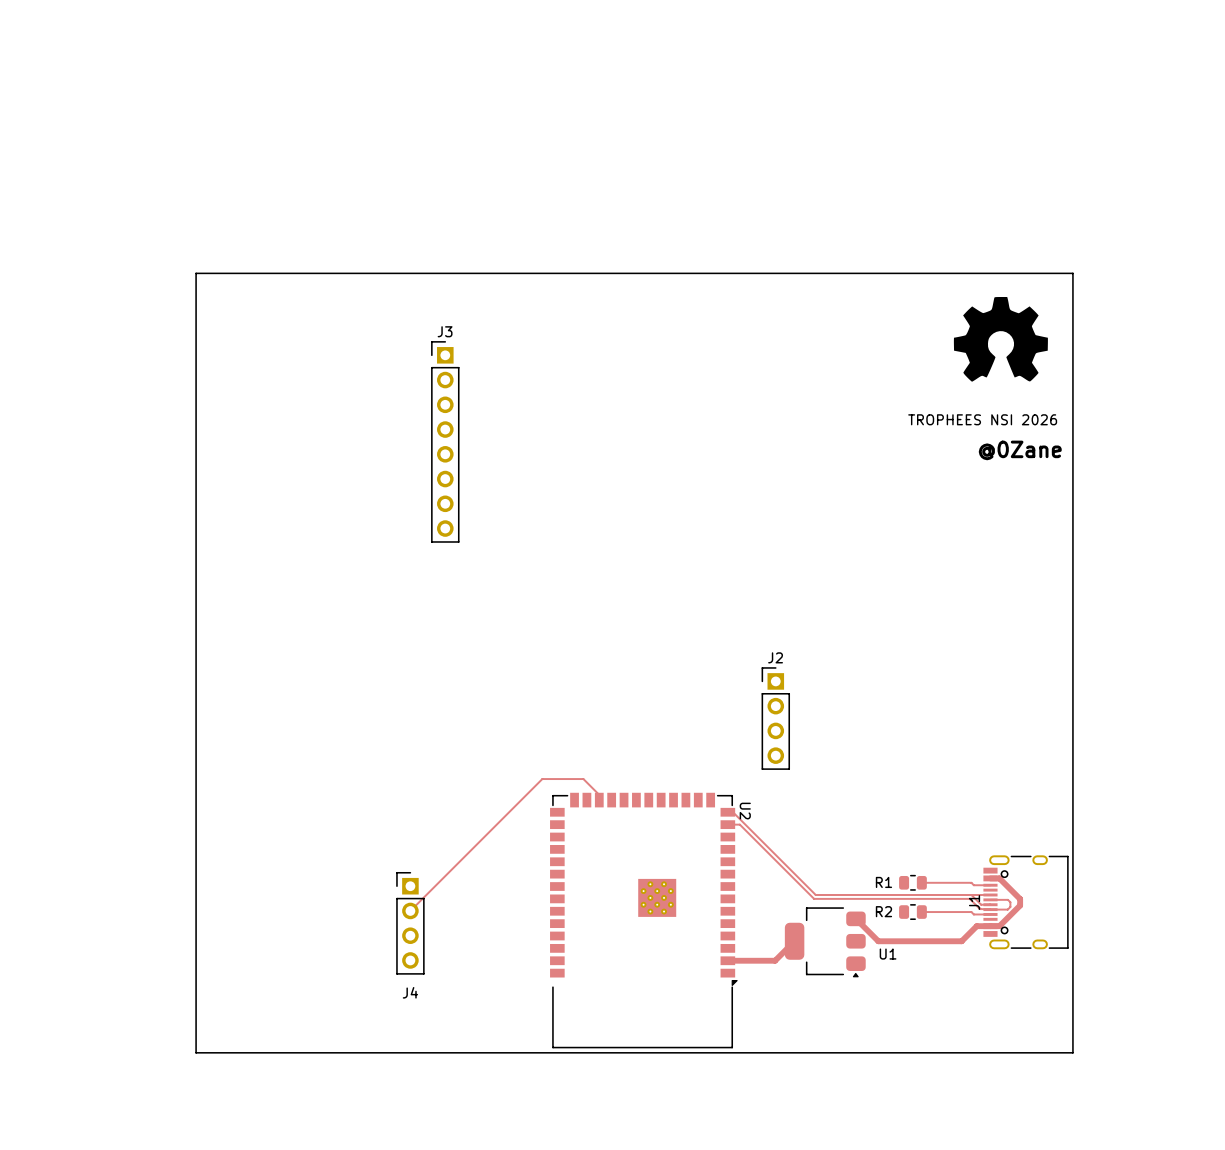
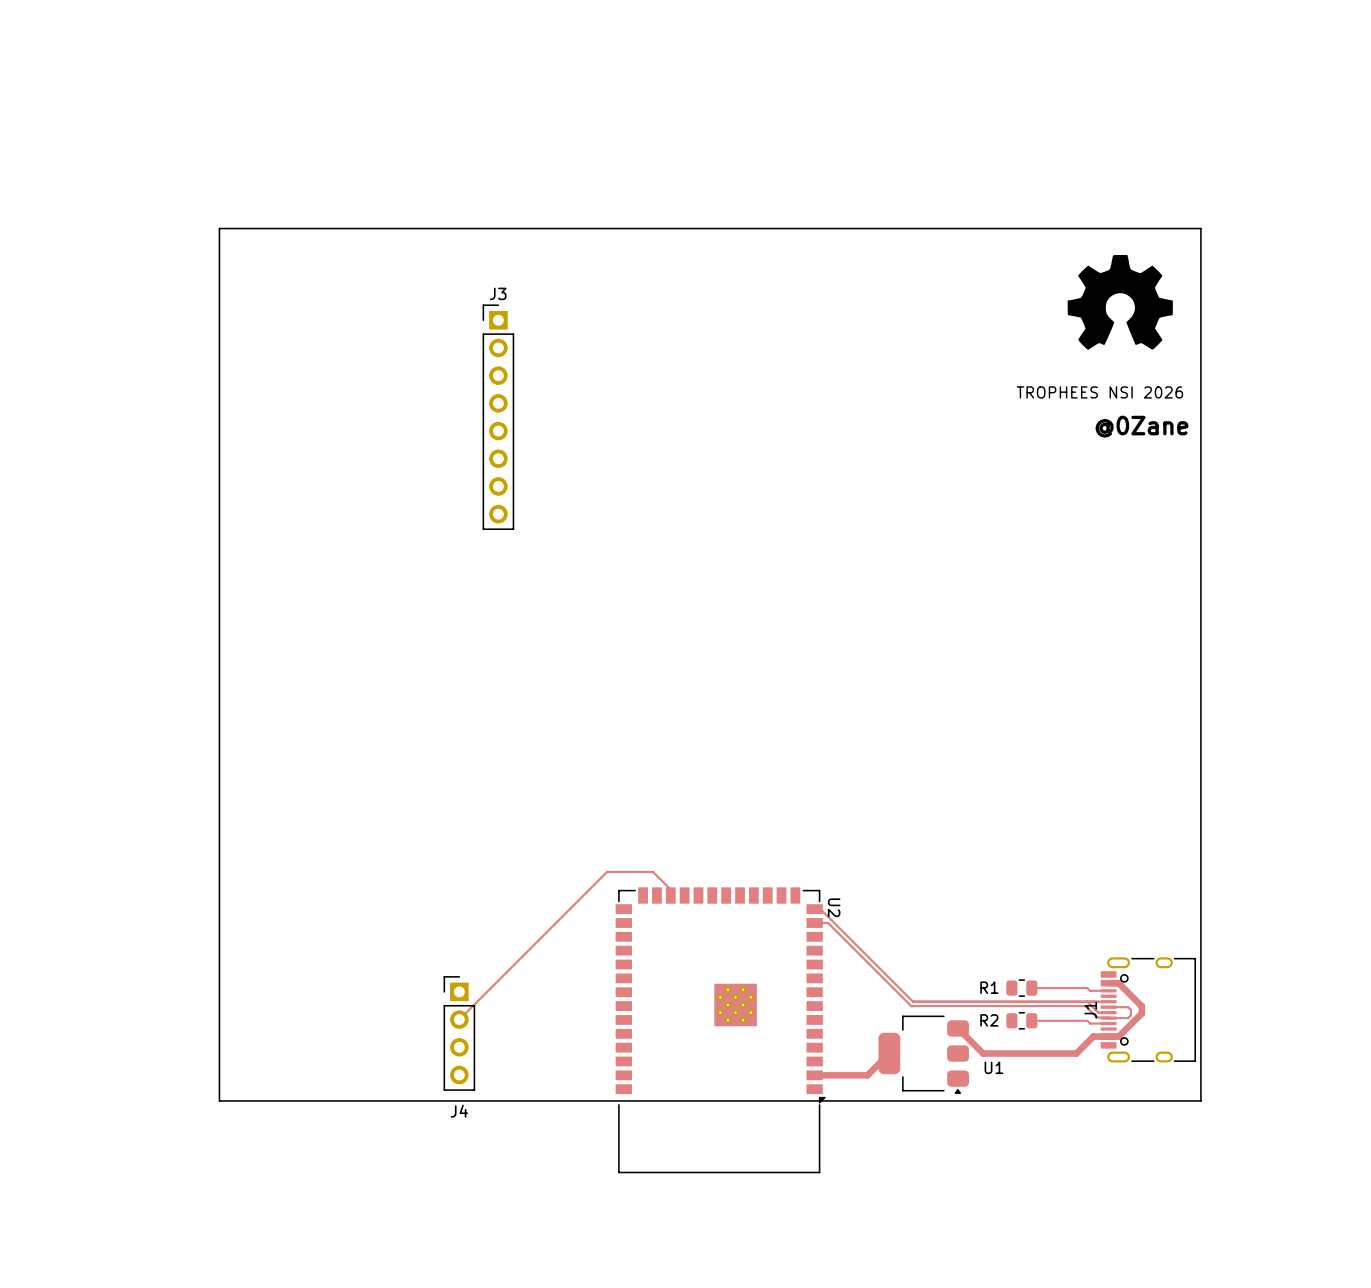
board edge: (196, 273) (1072, 273) -> (219, 305) (219, 228) (1200, 228) (1200, 305)
drawing position: (1000, 339) -> (1120, 302)
text position: TROPHEES NSI 2026 (982, 419) -> TROPHEES NSI 2026 (1099, 392)
J3 position: (445, 441) -> (498, 417)
text position: @0Zane (1020, 450) -> @0Zane (1141, 426)
J2: (775, 718) -> none
board edge: (196, 983) (196, 1052) (1072, 1052) (1072, 983) -> (219, 1100) (1200, 1100)

